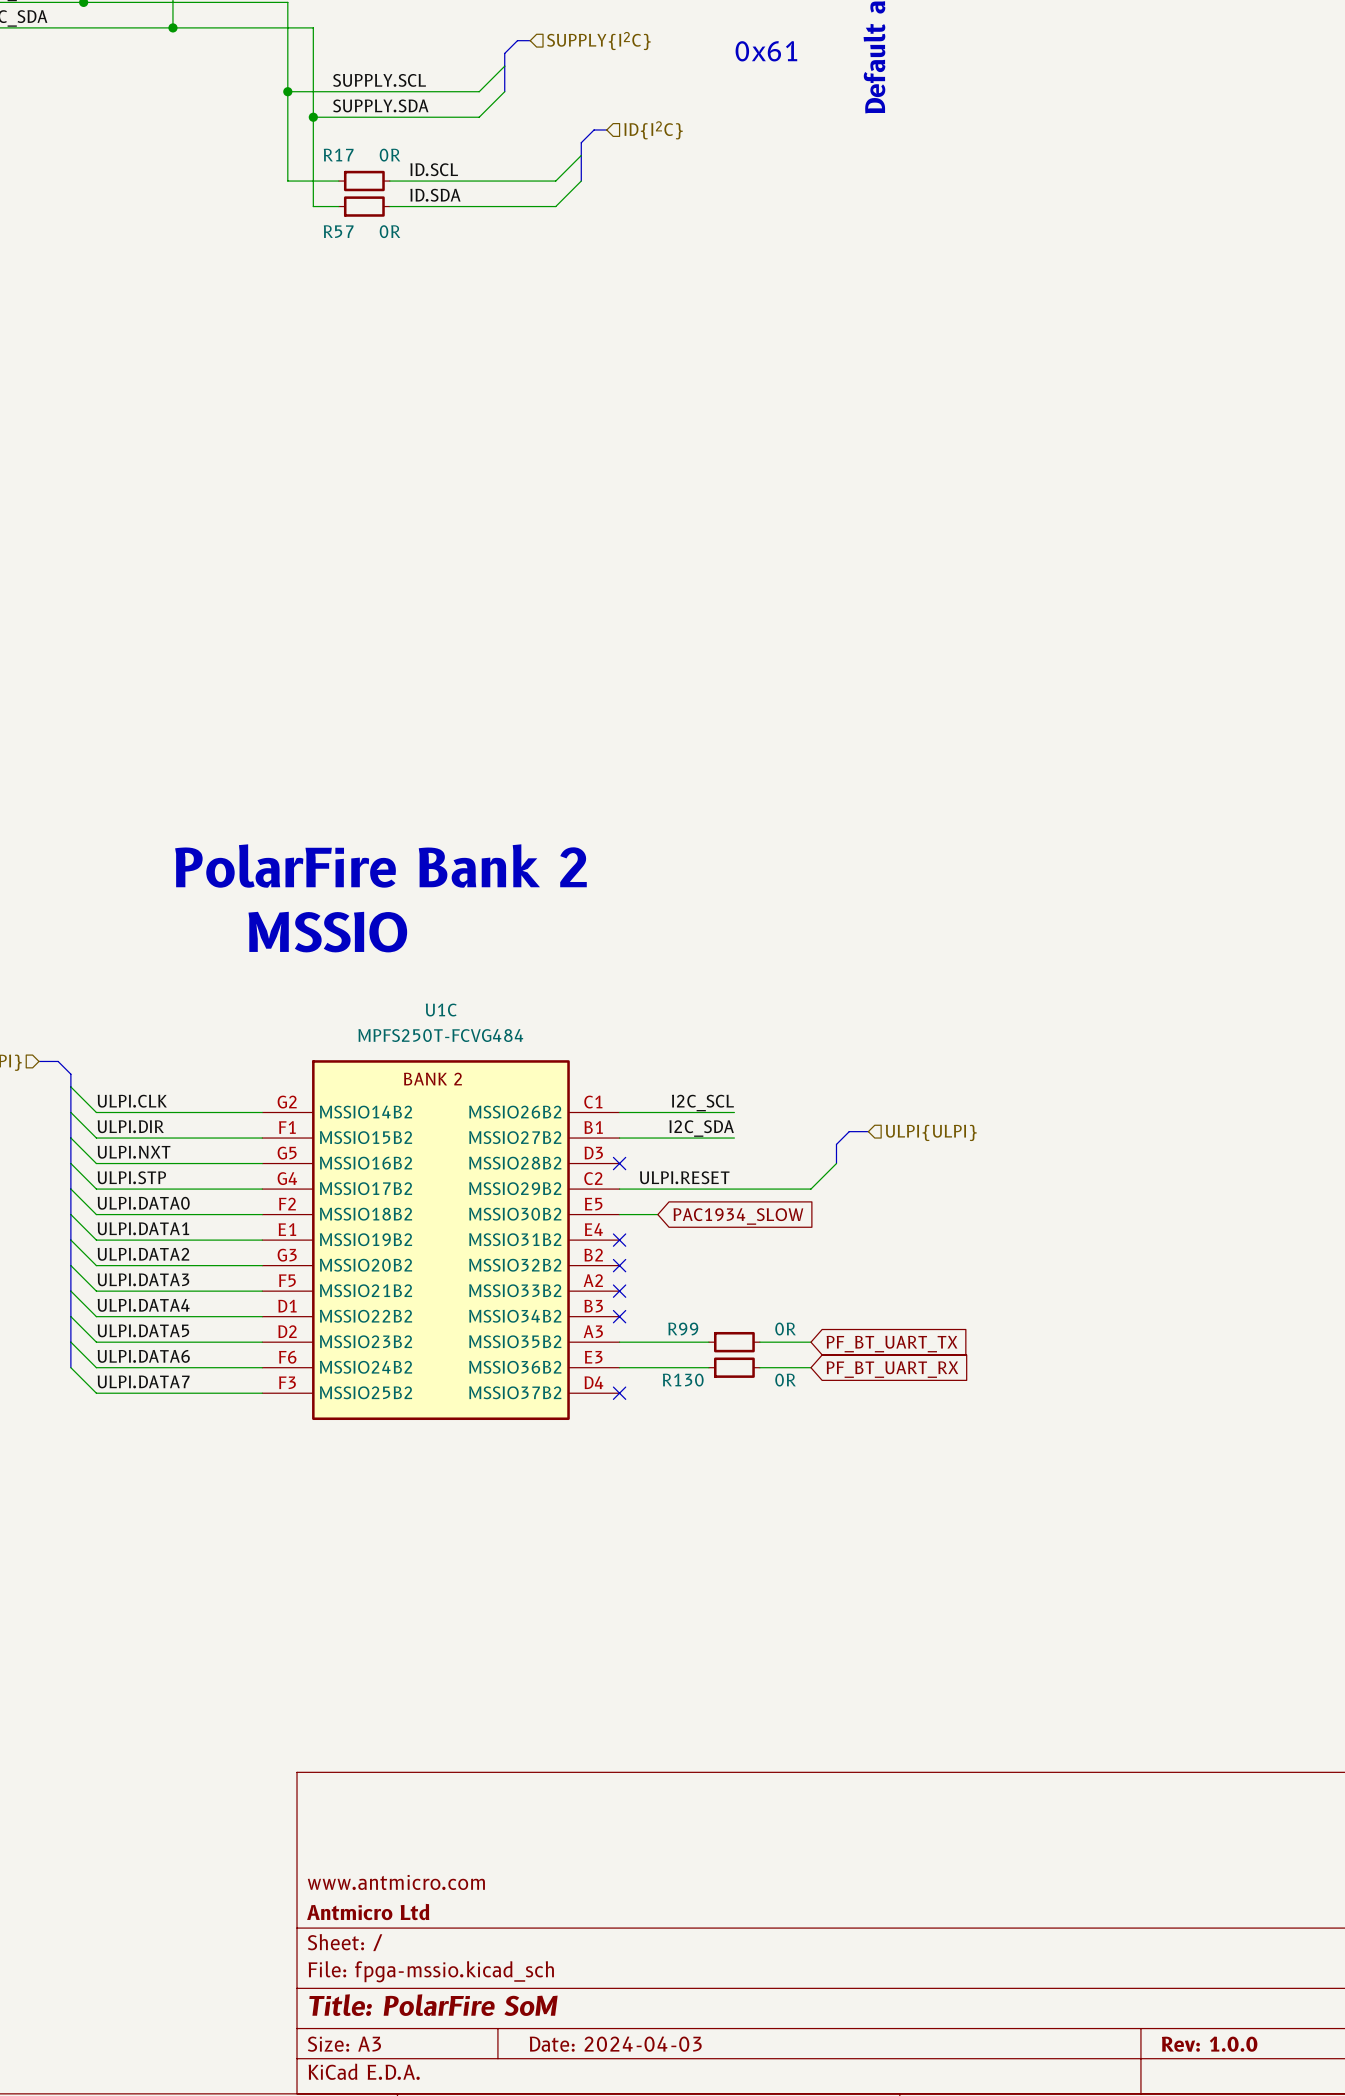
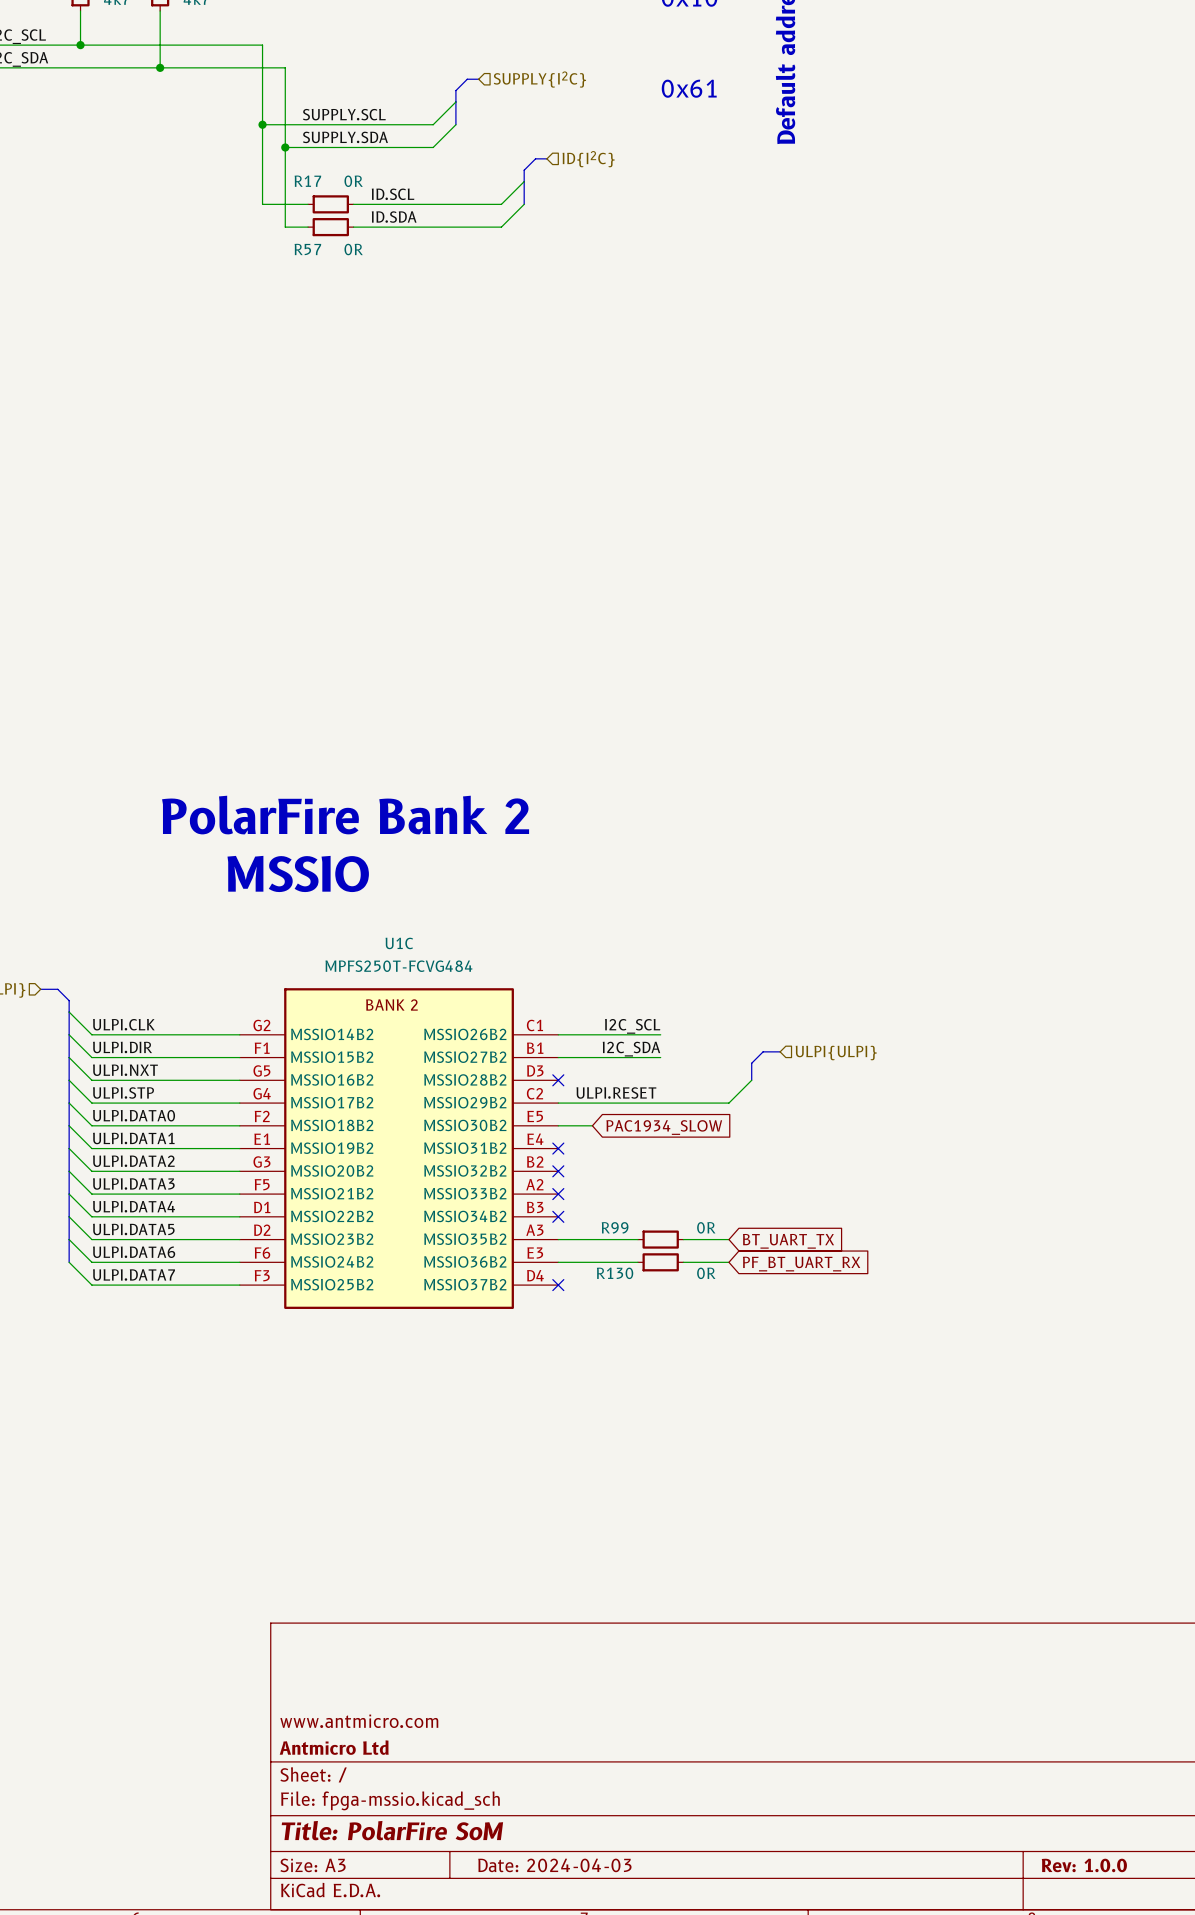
global label: PF_BT_UART_TX (892, 1344) -> BT_UART_TX (788, 1241)

